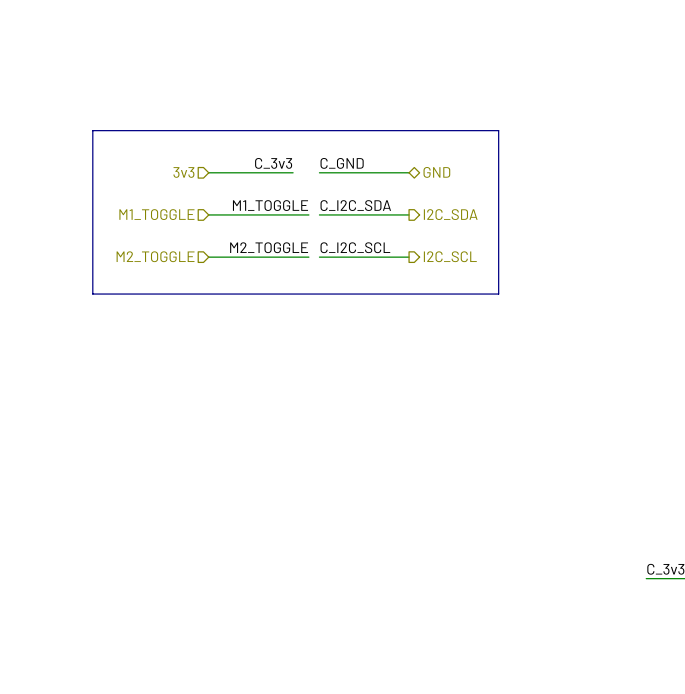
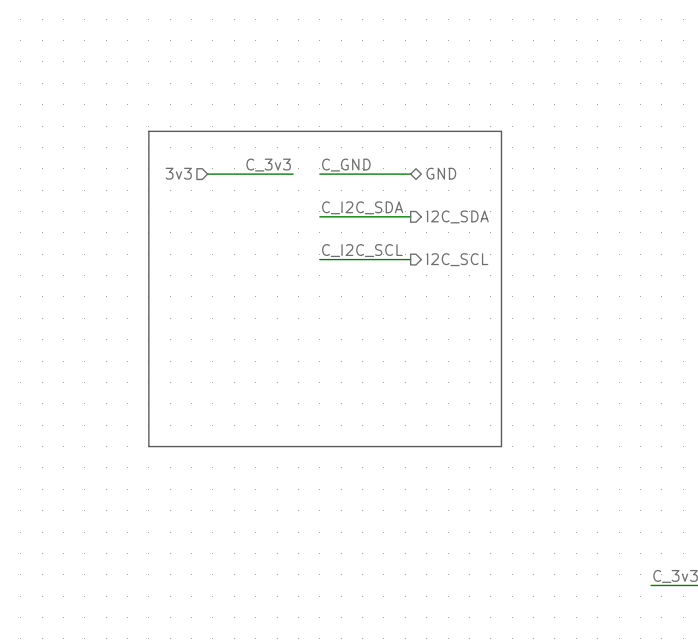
line: (150, 130) (92, 130) (92, 294) (498, 294) -> (148, 131) (148, 446) (501, 446) (501, 296)
label: M1_TOGGLE (270, 205) -> none
hierarchical label: M1_TOGGLE (156, 214) -> none
wire: (208, 214) (308, 214) -> none
label: M2_TOGGLE (269, 247) -> none
hierarchical label: M2_TOGGLE (155, 256) -> none
wire: (208, 257) (308, 257) -> none

